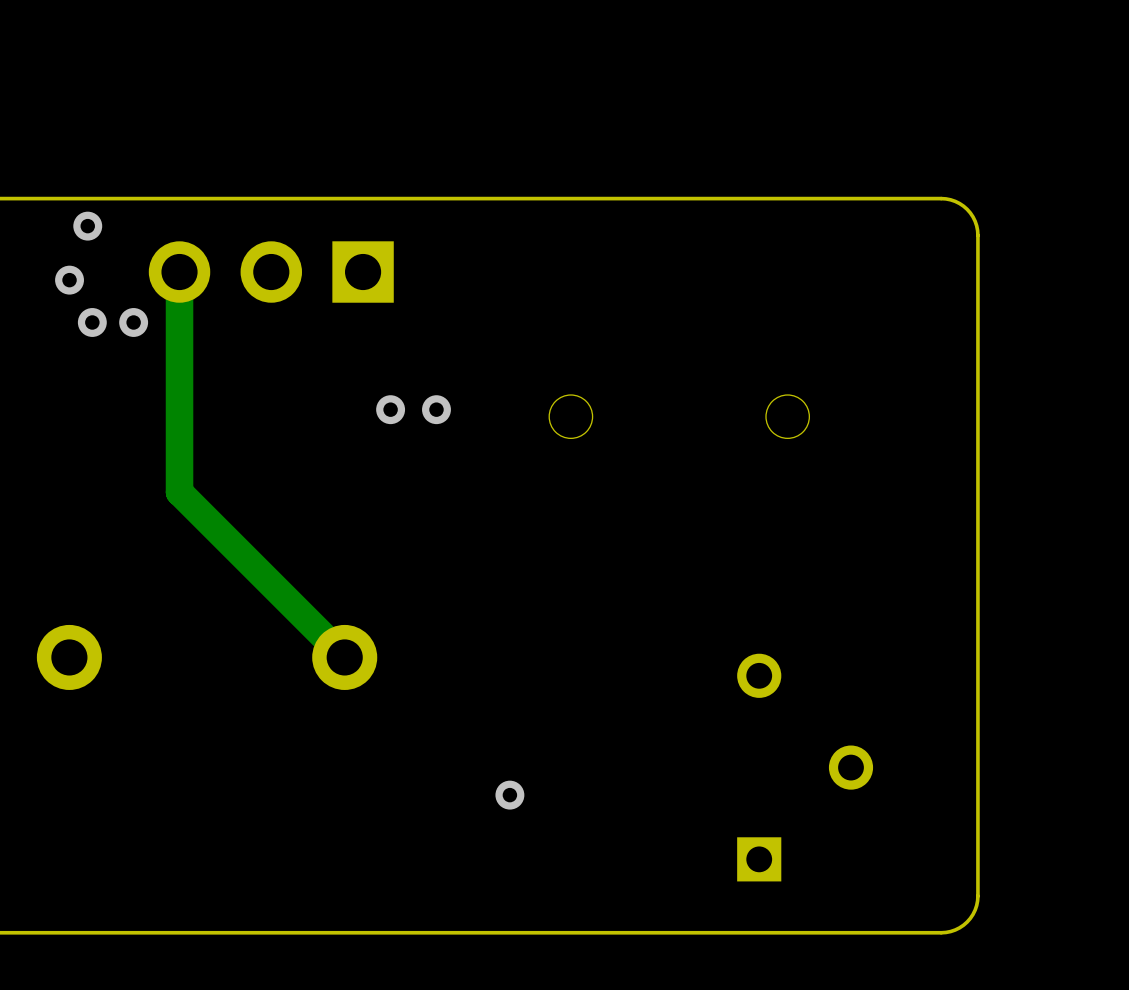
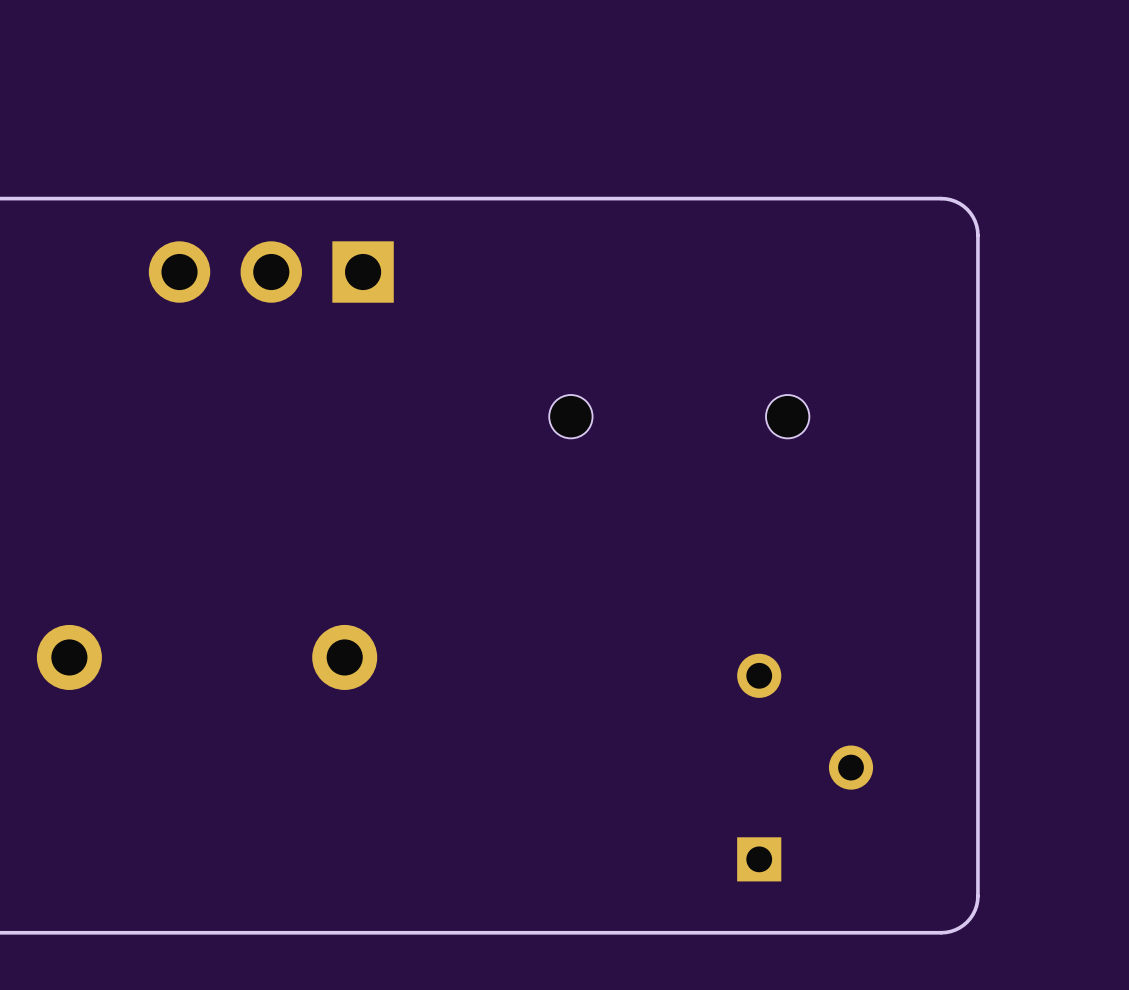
via: (87, 226) -> none
track: (179, 272) (179, 492) (344, 657) -> none
via: (69, 280) -> none
via: (92, 322) -> none
via: (133, 322) -> none
via: (390, 409) -> none
via: (436, 409) -> none
via: (509, 795) -> none

